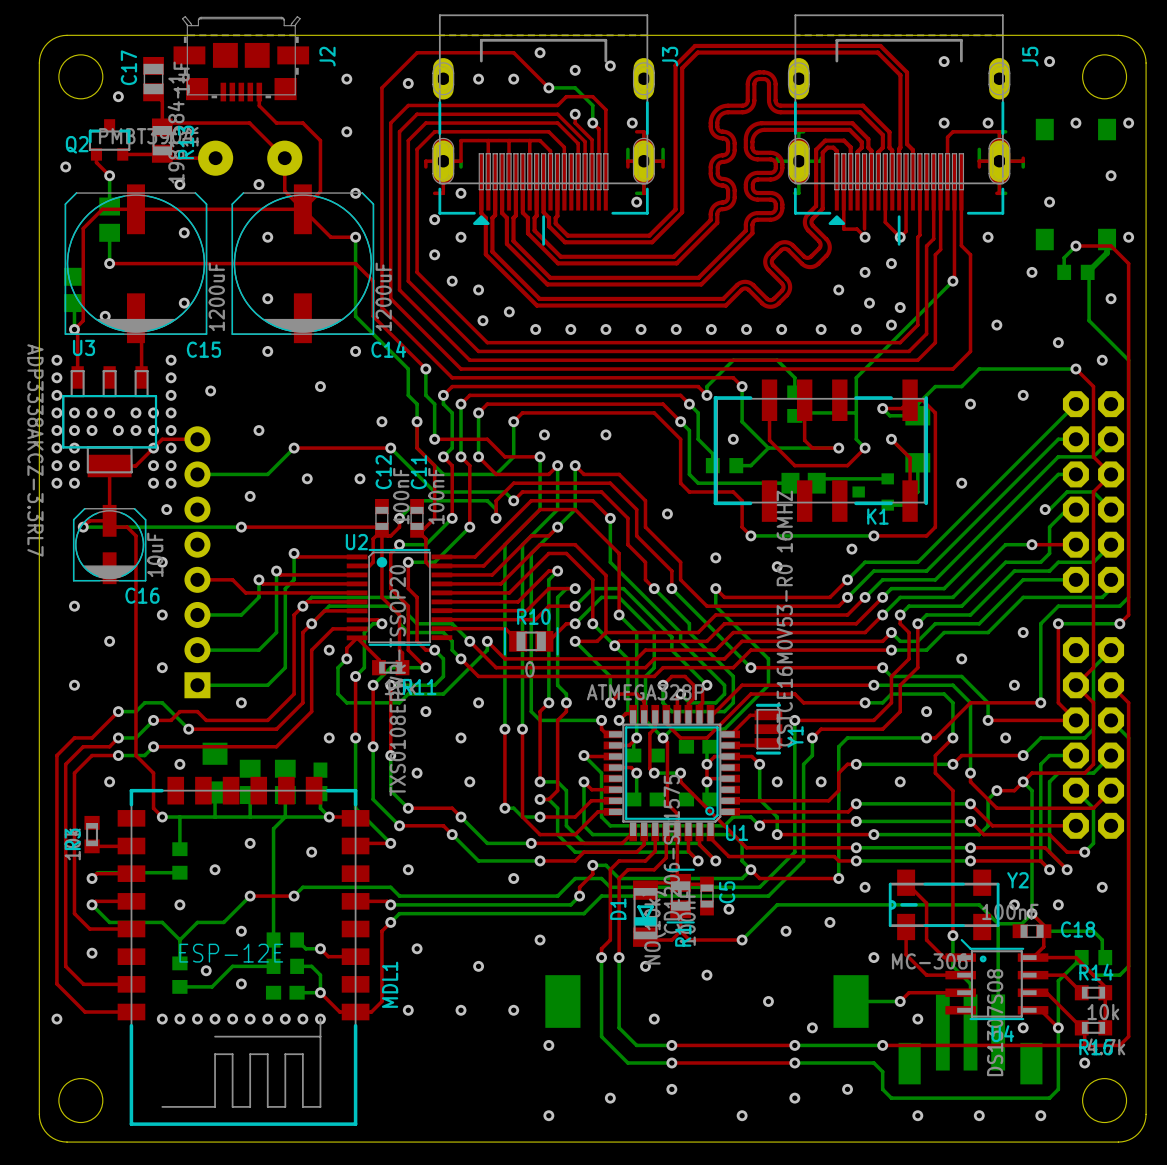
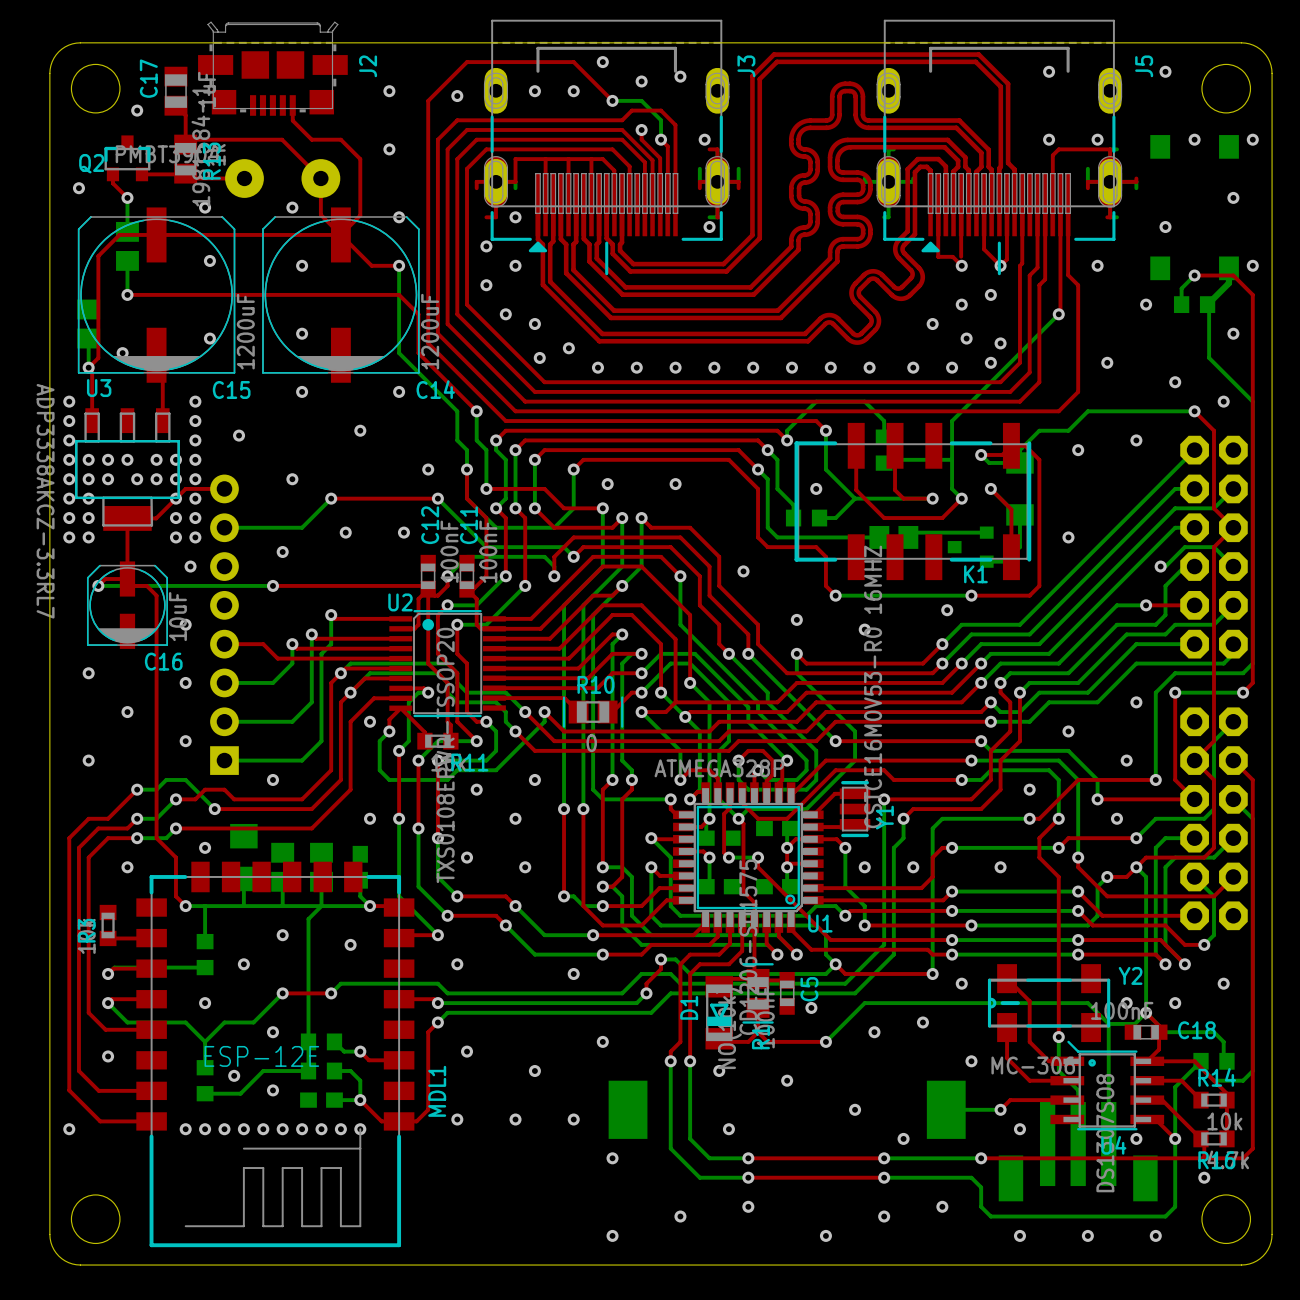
J3 footprint: [432, 14, 655, 246] -> [484, 19, 730, 276]
J5 footprint: [788, 14, 1010, 246] -> [877, 19, 1122, 276]

